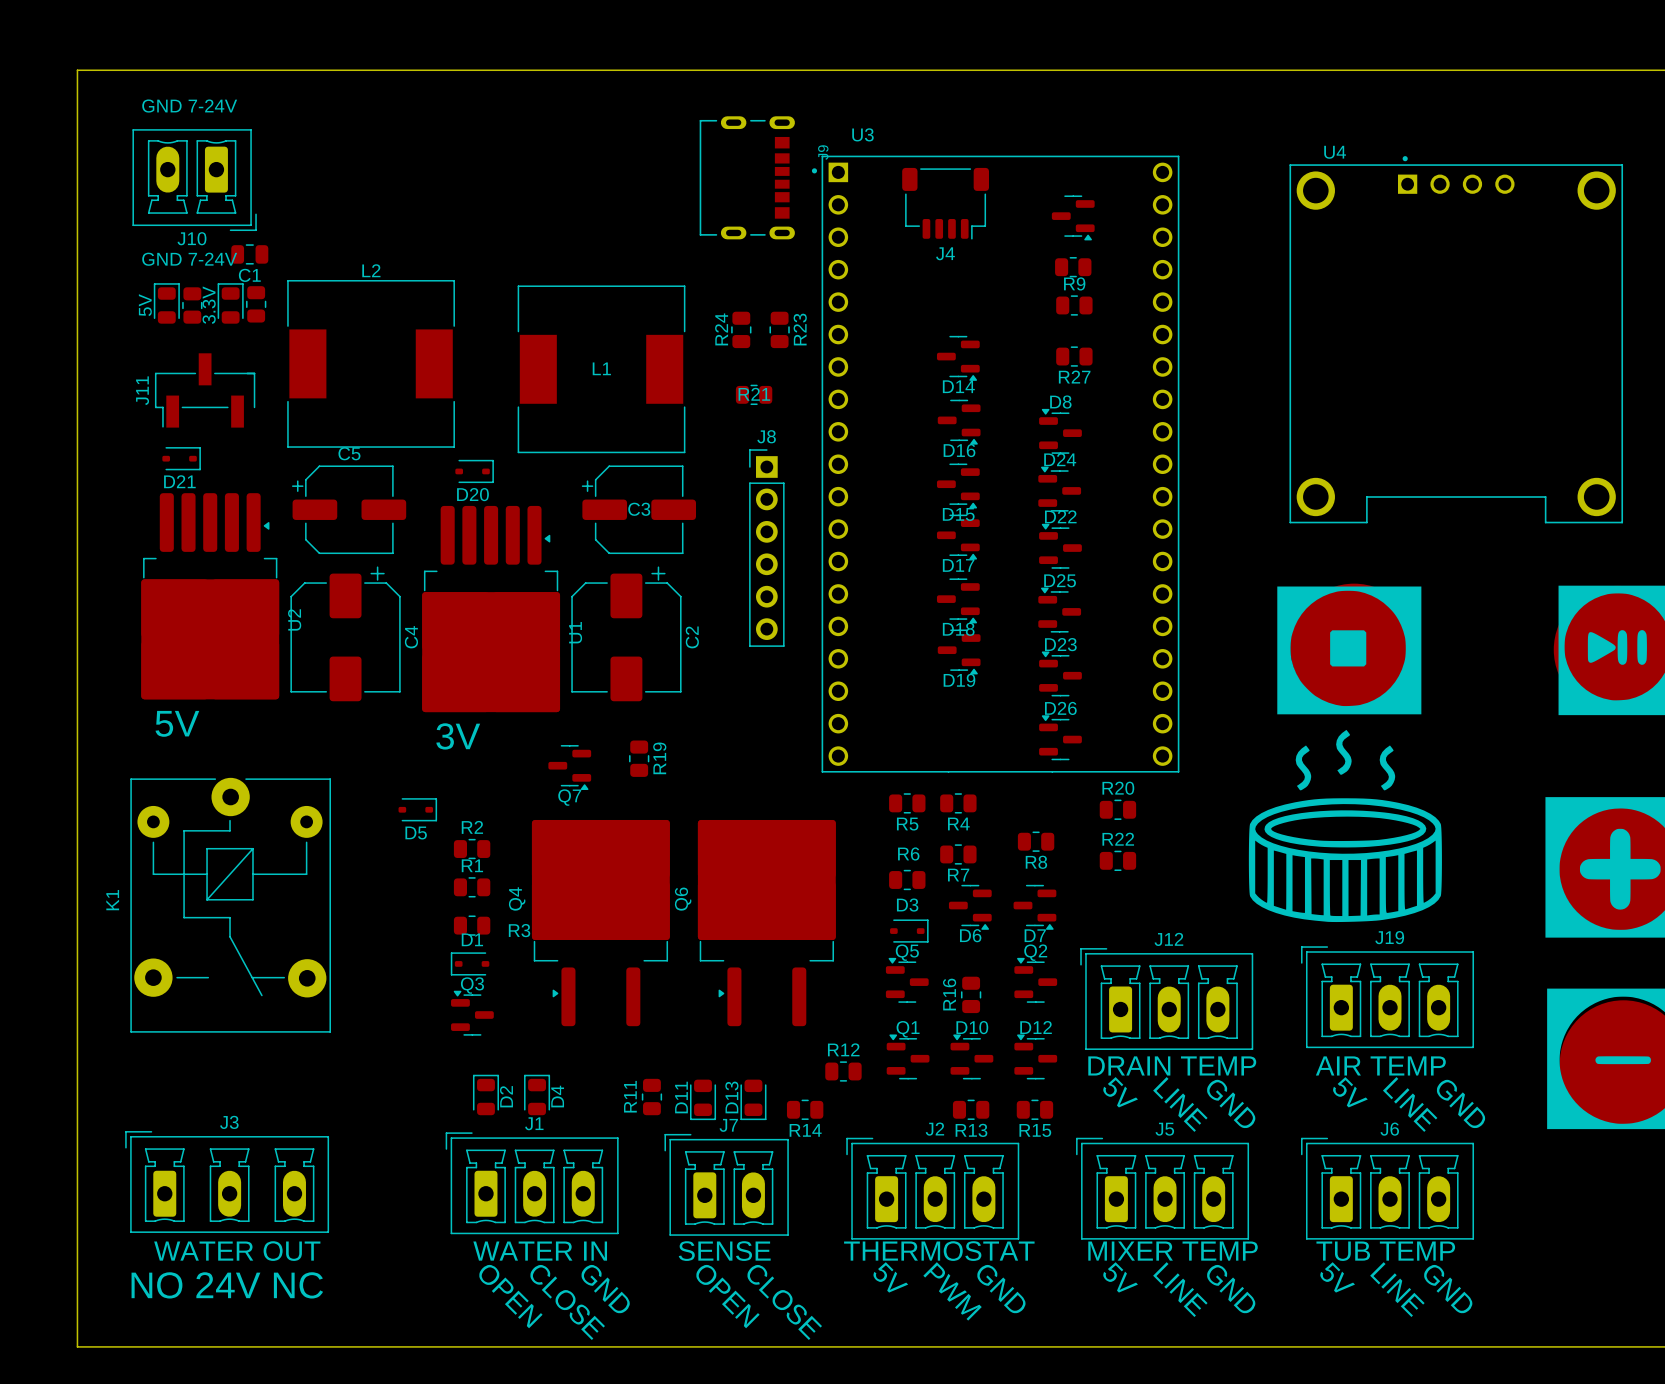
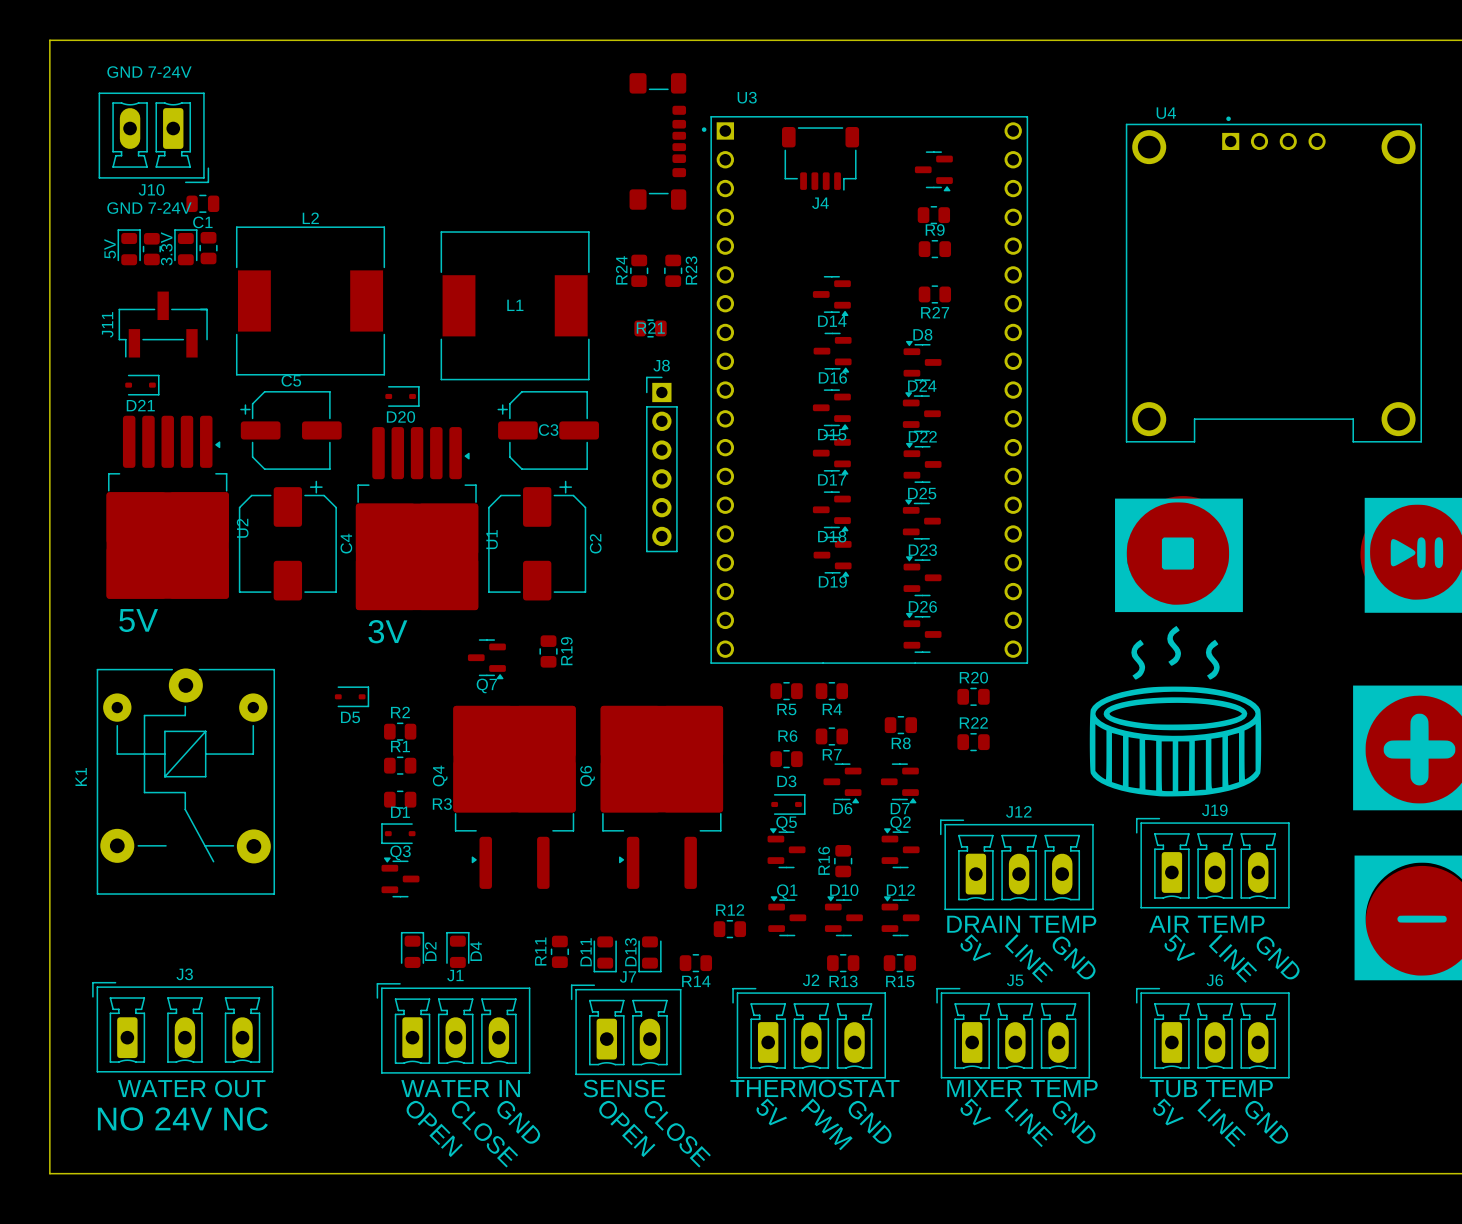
J9: (747, 177) -> none
part: none -> (657, 141)

